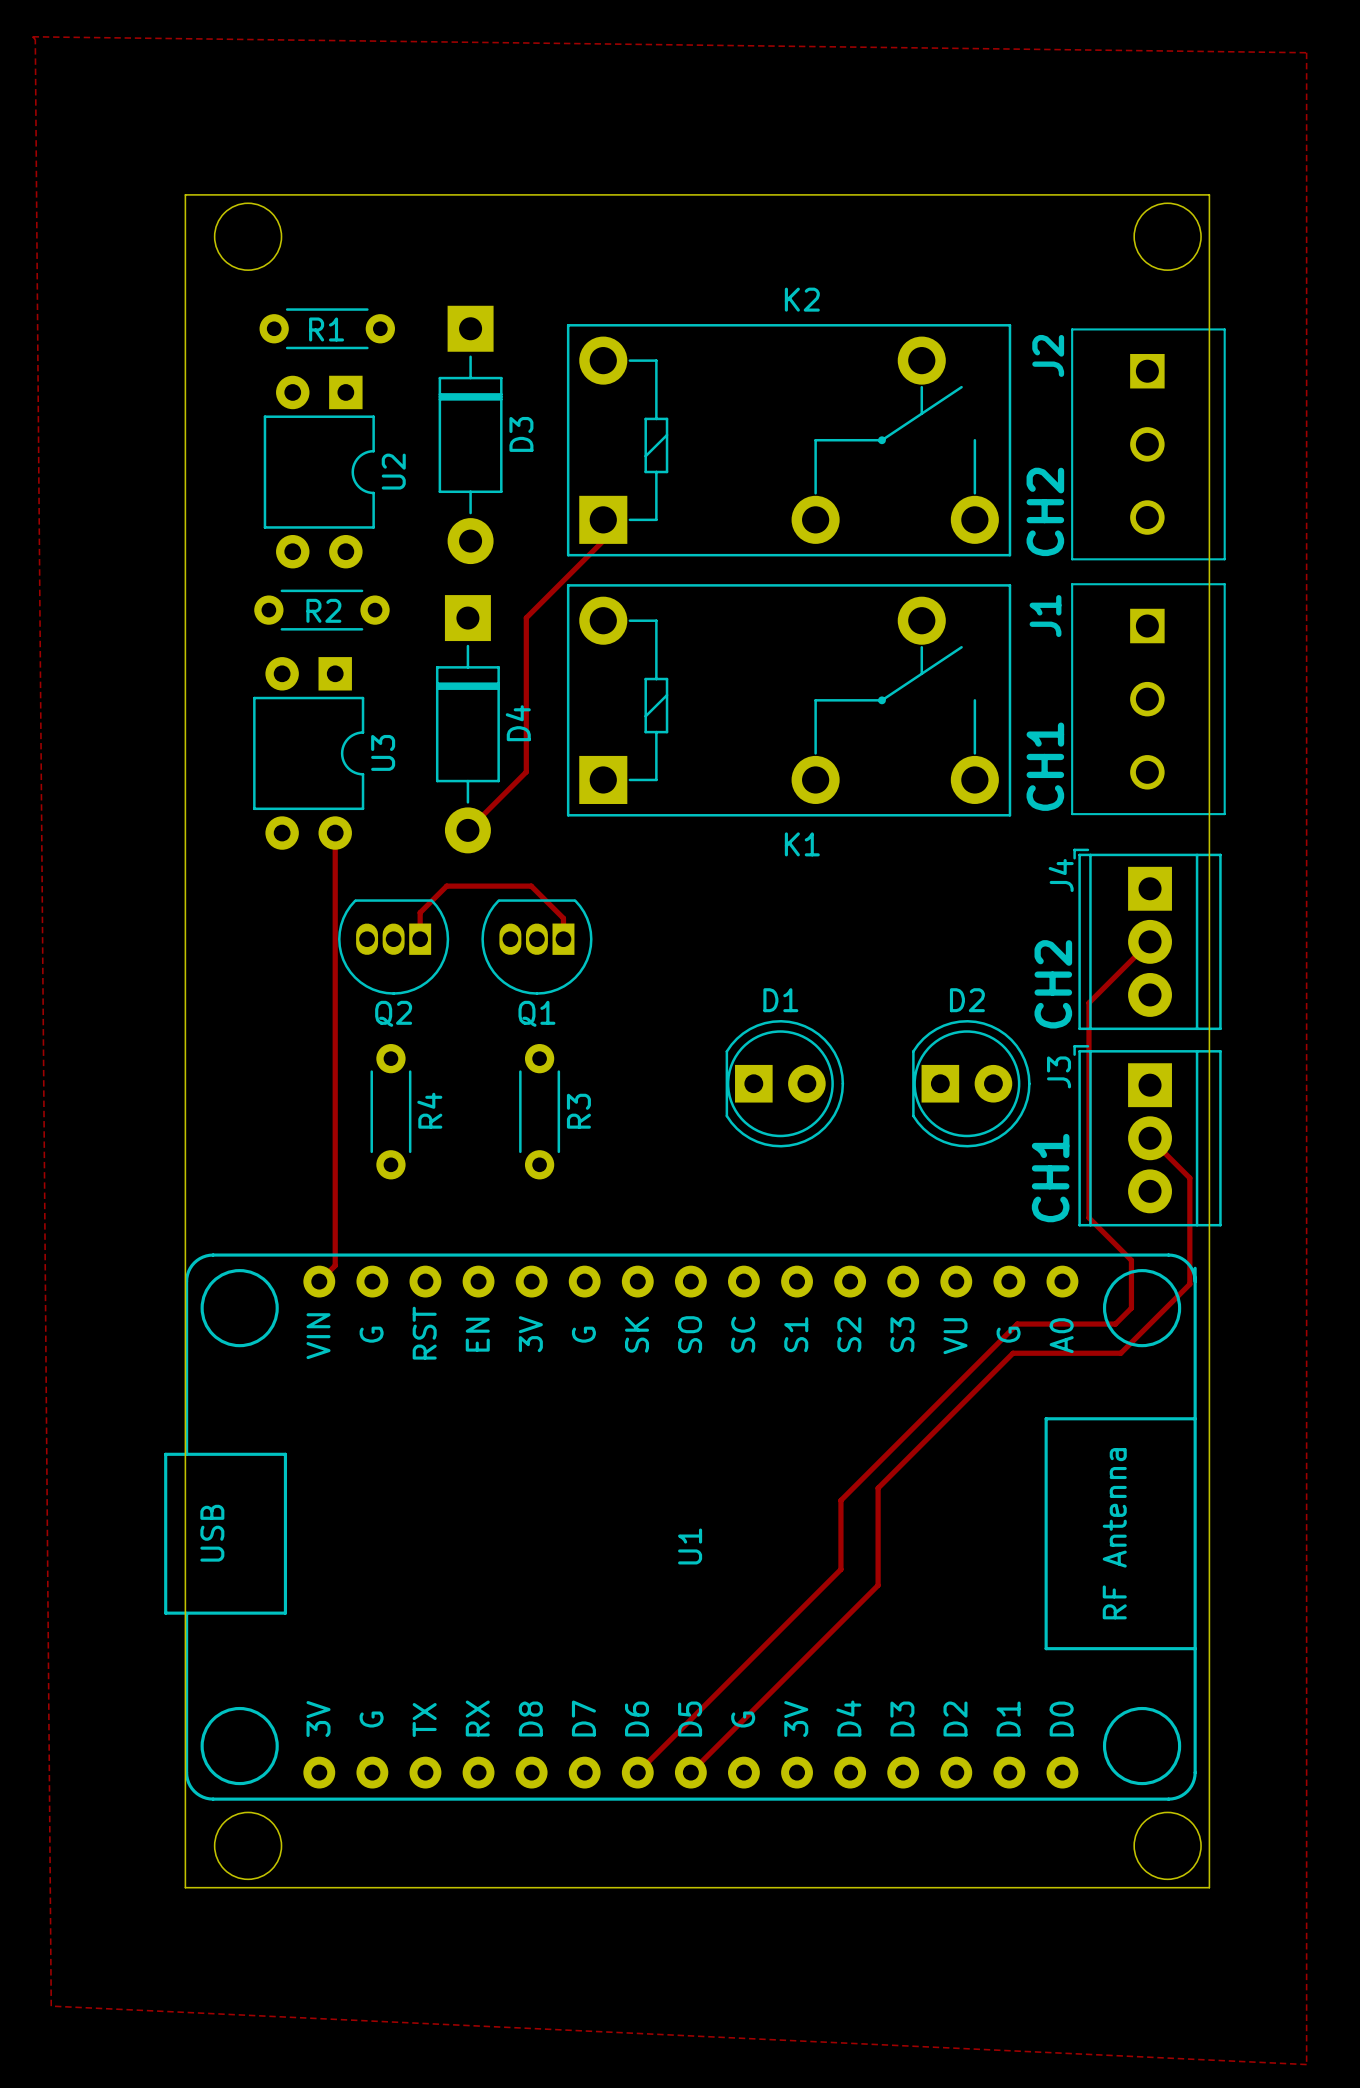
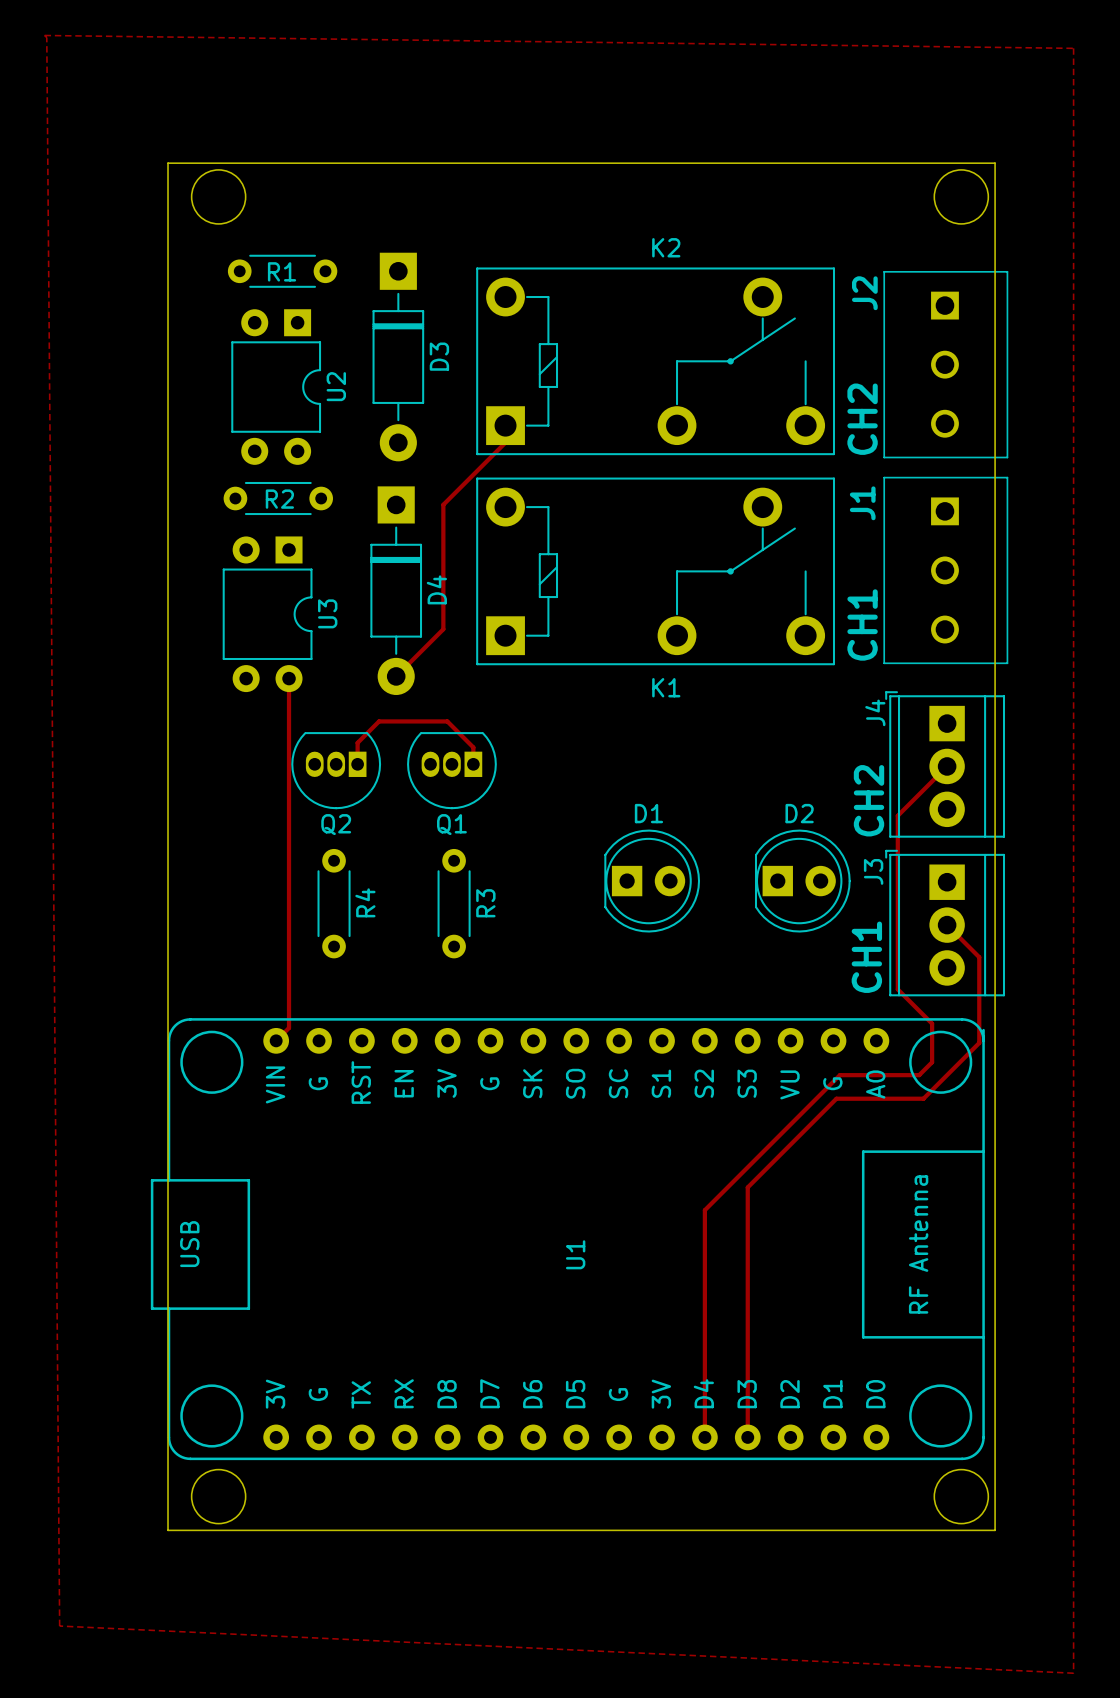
track: (903, 1463) (878, 1488) (878, 1585) (690, 1772) -> (747, 1187) (747, 1437)
track: (850, 1491) (840, 1500) (840, 1569) (637, 1772) -> (704, 1210) (704, 1437)

